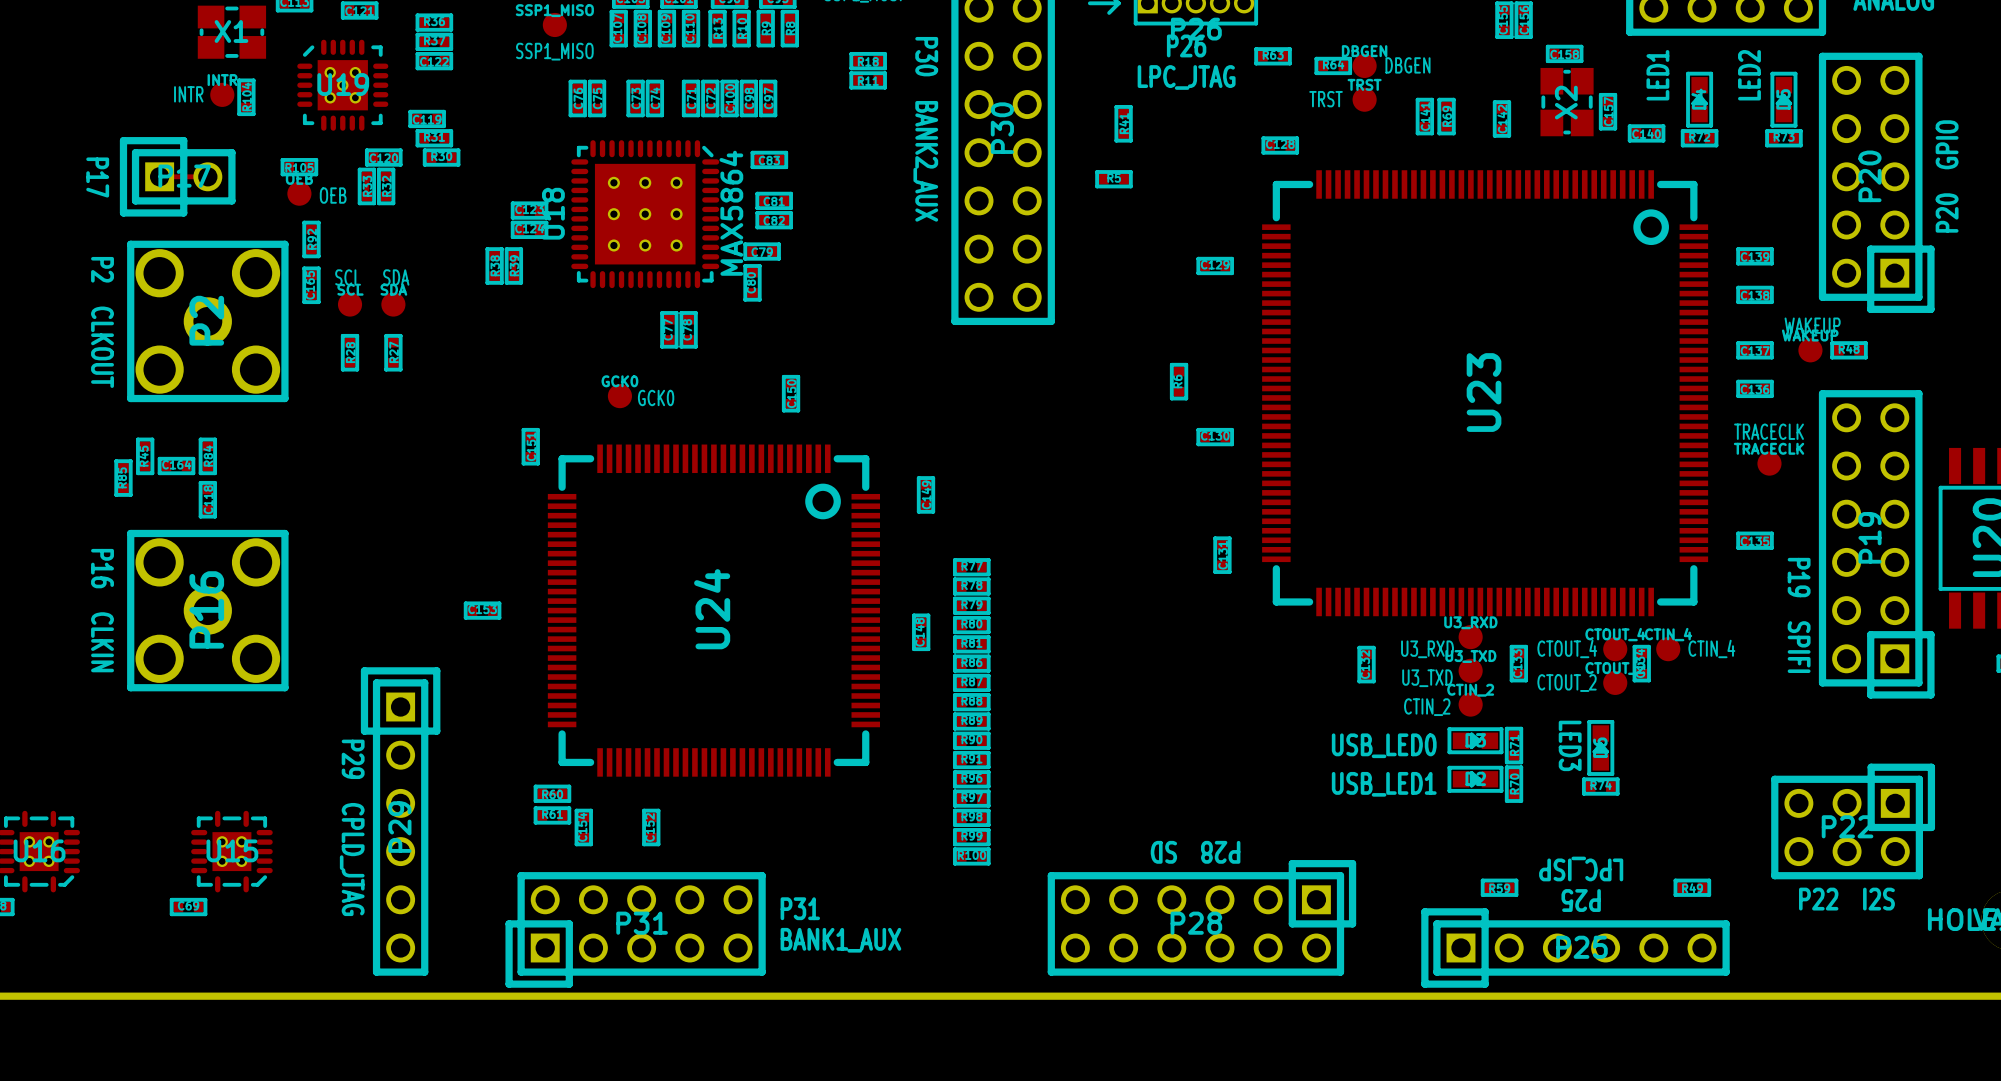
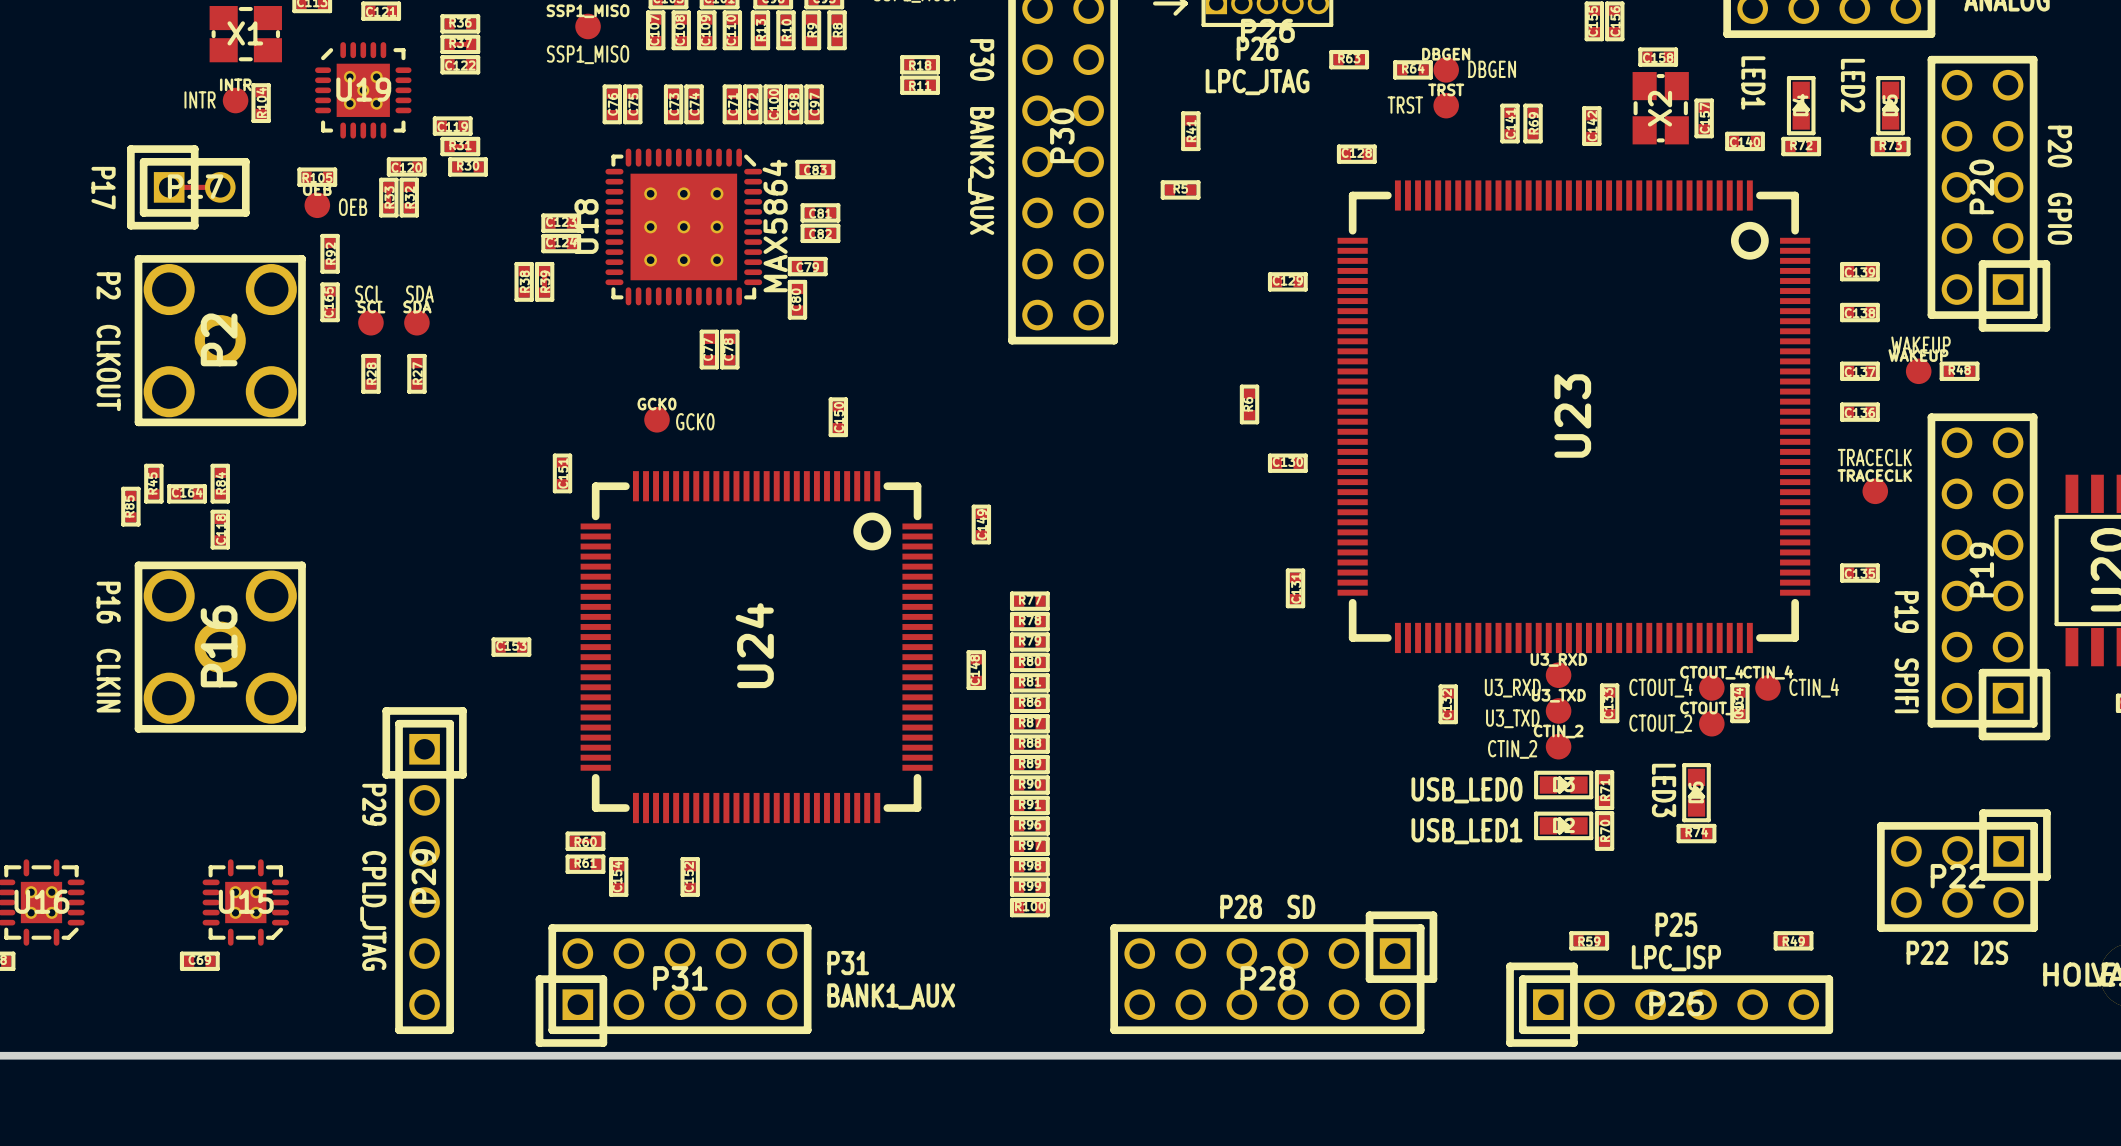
text rotation: 0° (1657, 75) -> 180° (1753, 83)
text rotation: 0° (1749, 75) -> 180° (1853, 85)
text rotation: 0° (1947, 176) -> 180° (2059, 185)
text rotation: 0° (1195, 852) -> 180° (1267, 906)
text rotation: 0° (1581, 868) -> 180° (1676, 958)
text rotation: 0° (1581, 900) -> 180° (1676, 924)

